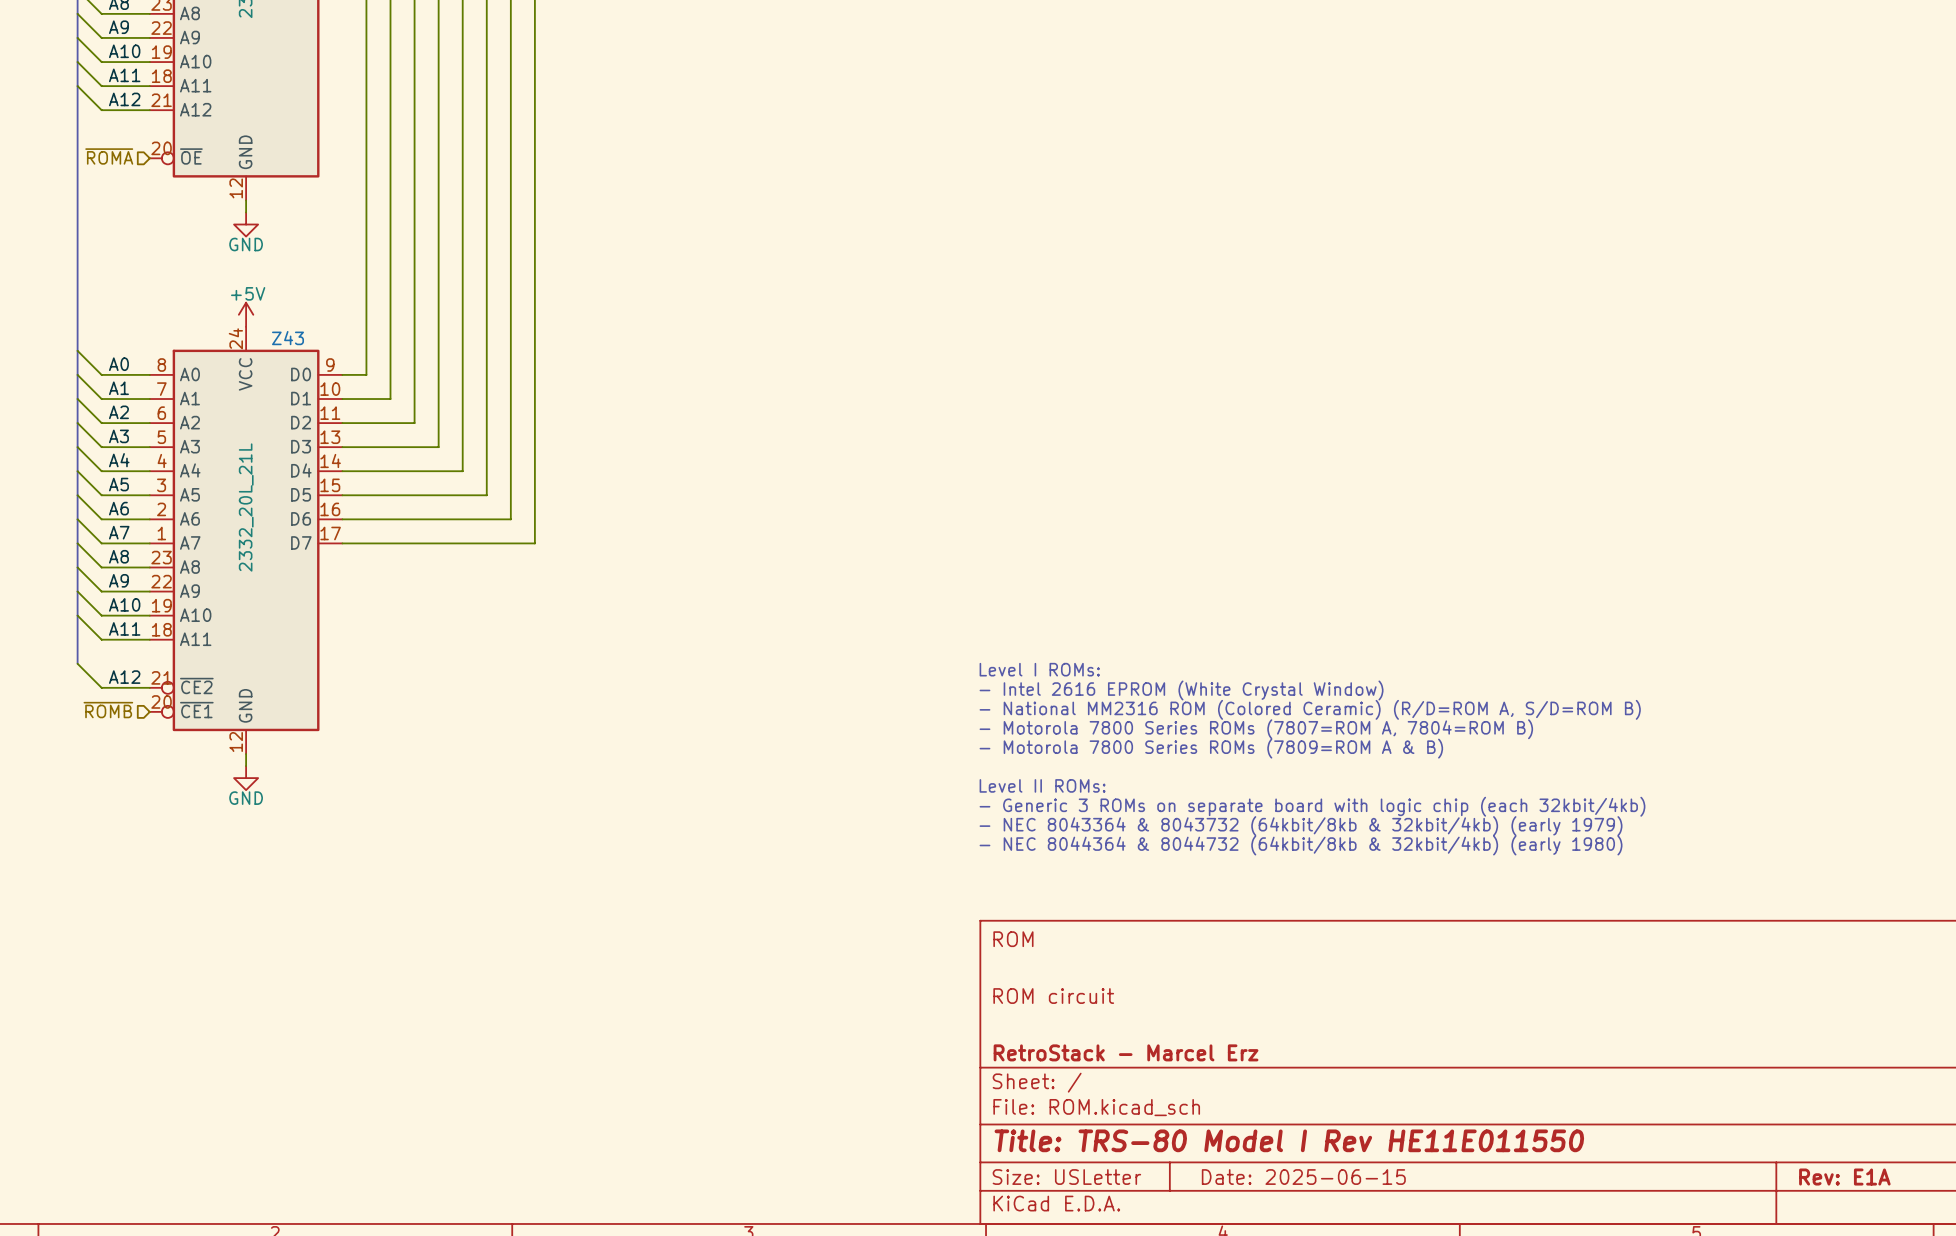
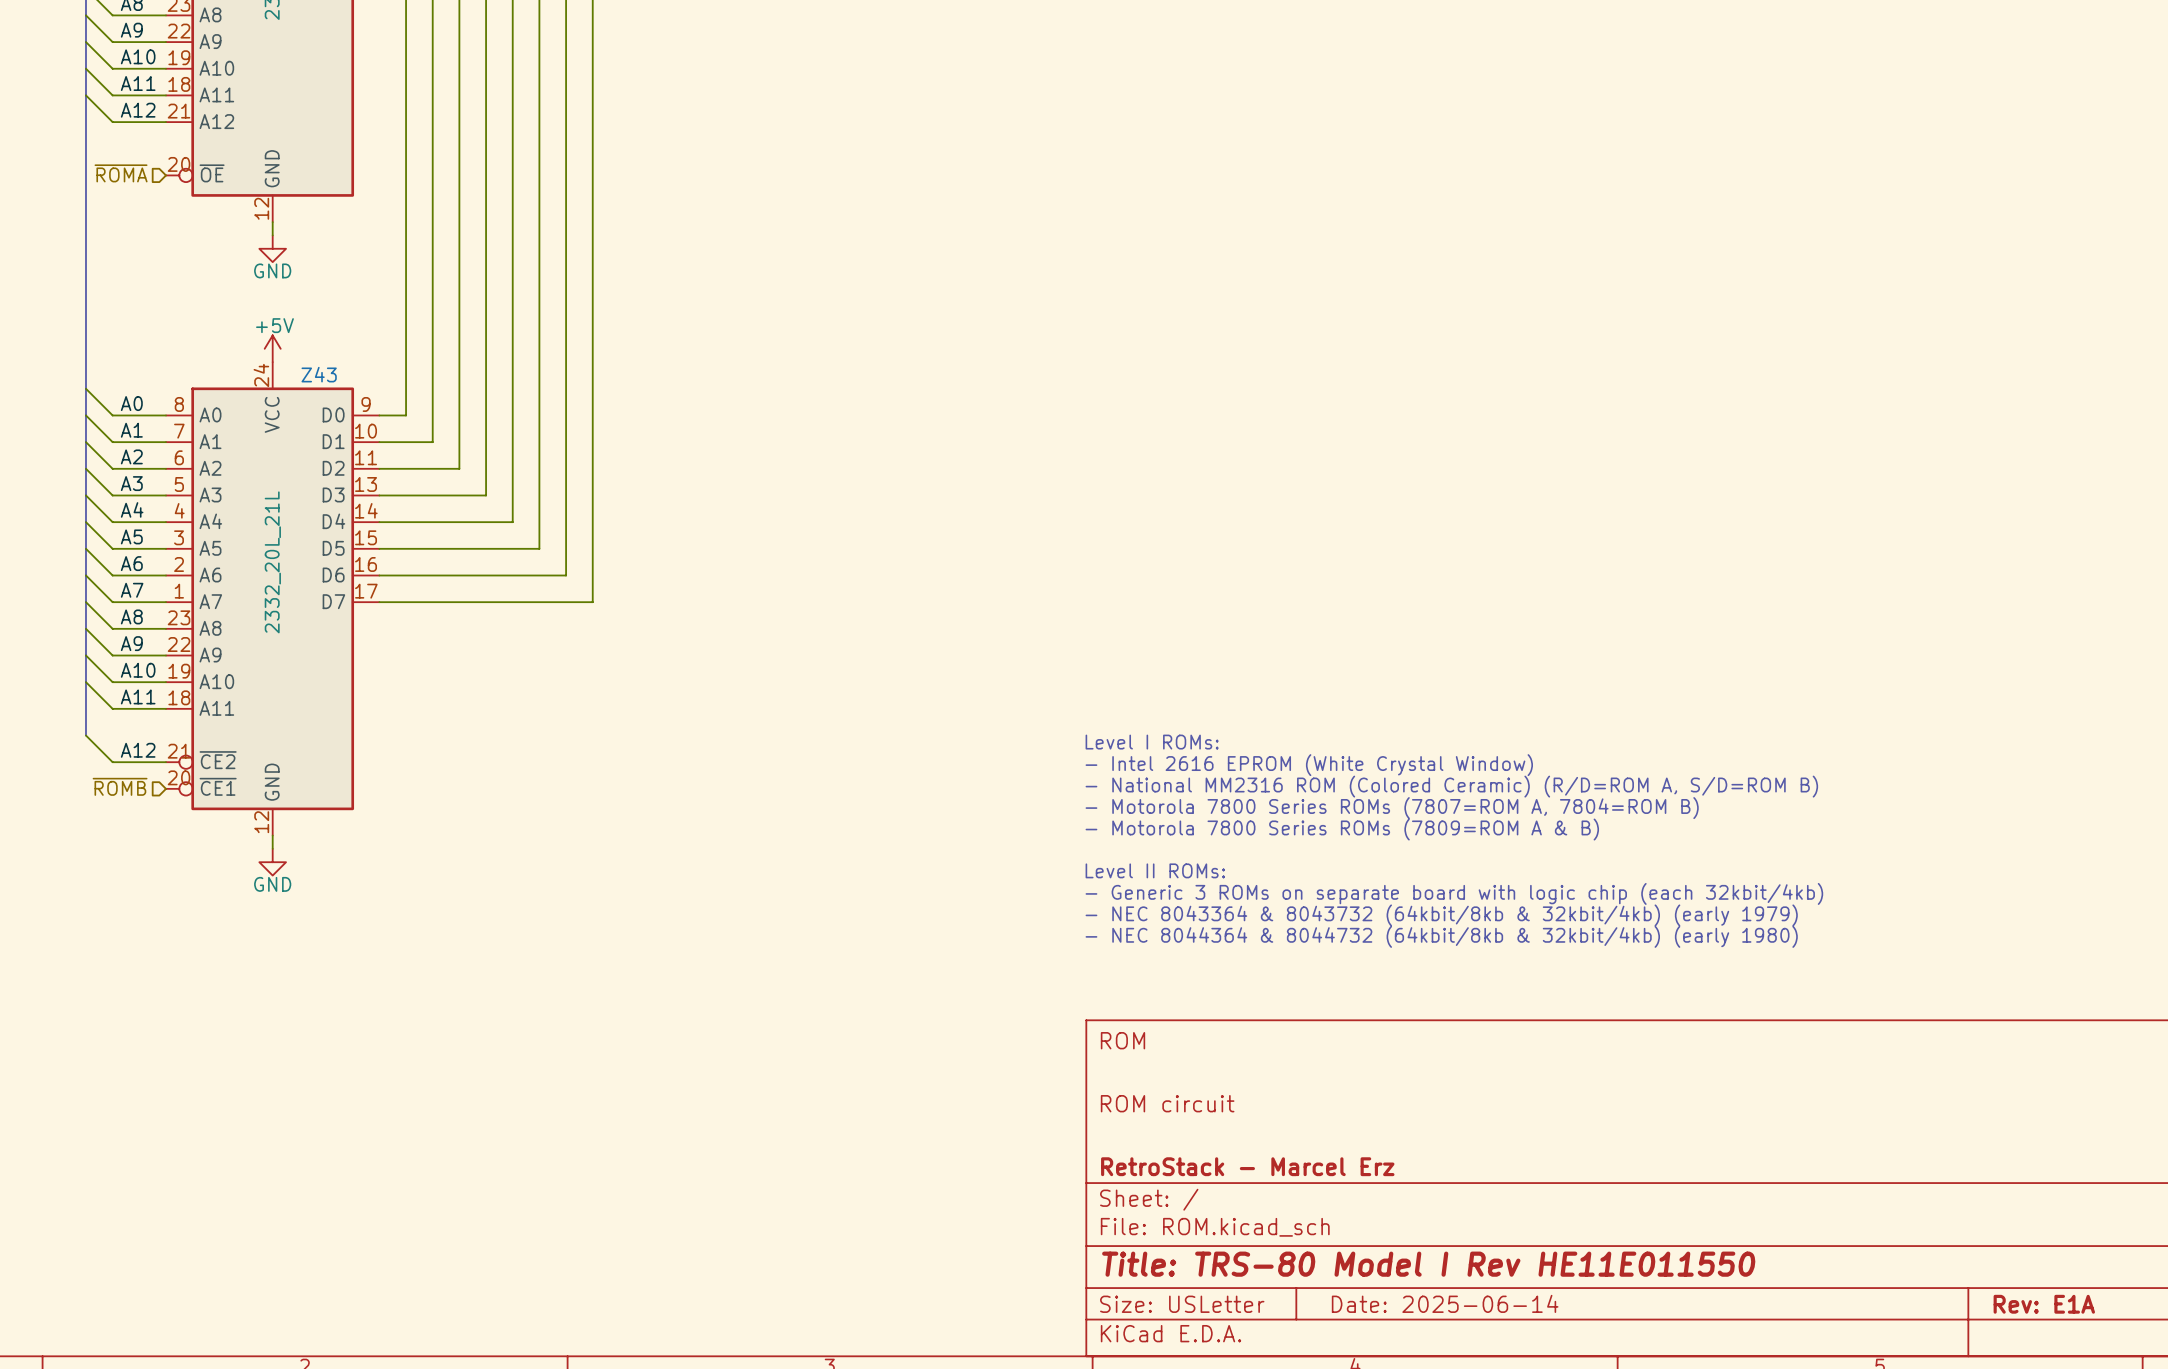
title block: Date: 2025-06-15 (1303, 1177) -> Date: 2025-06-14 (1445, 1303)

